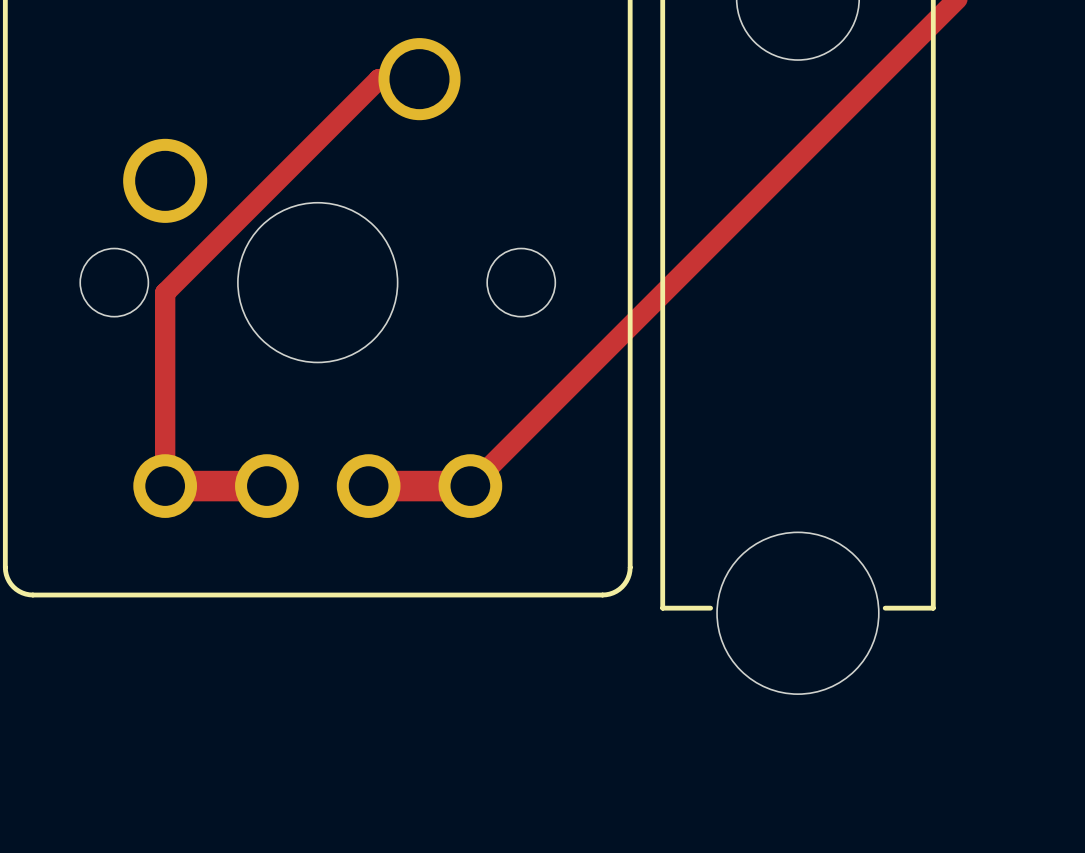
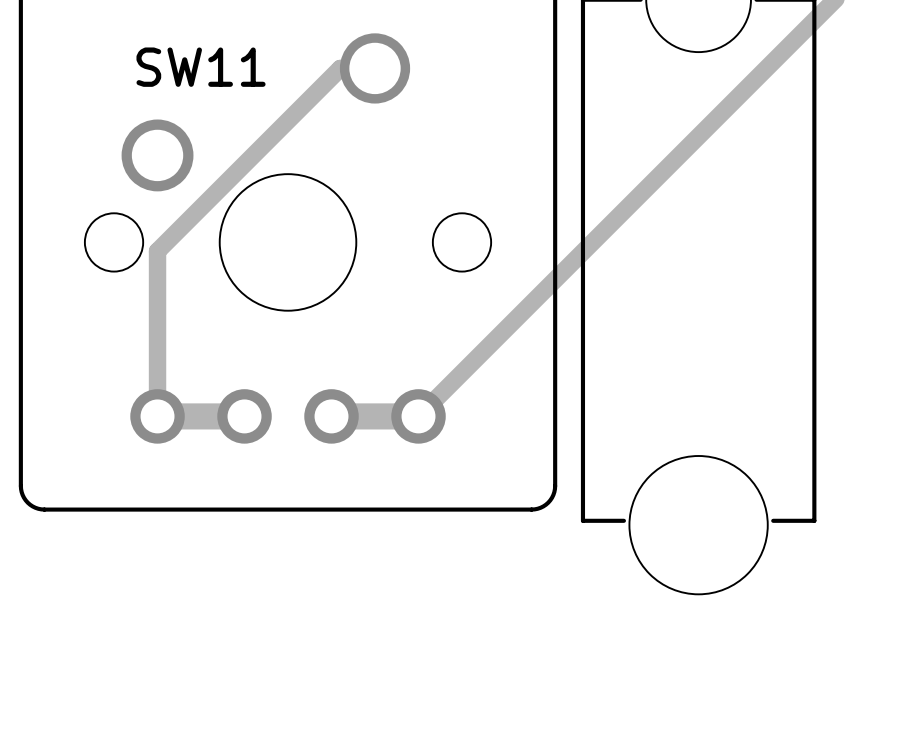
SW11 name: none -> SW11 (201, 67)

